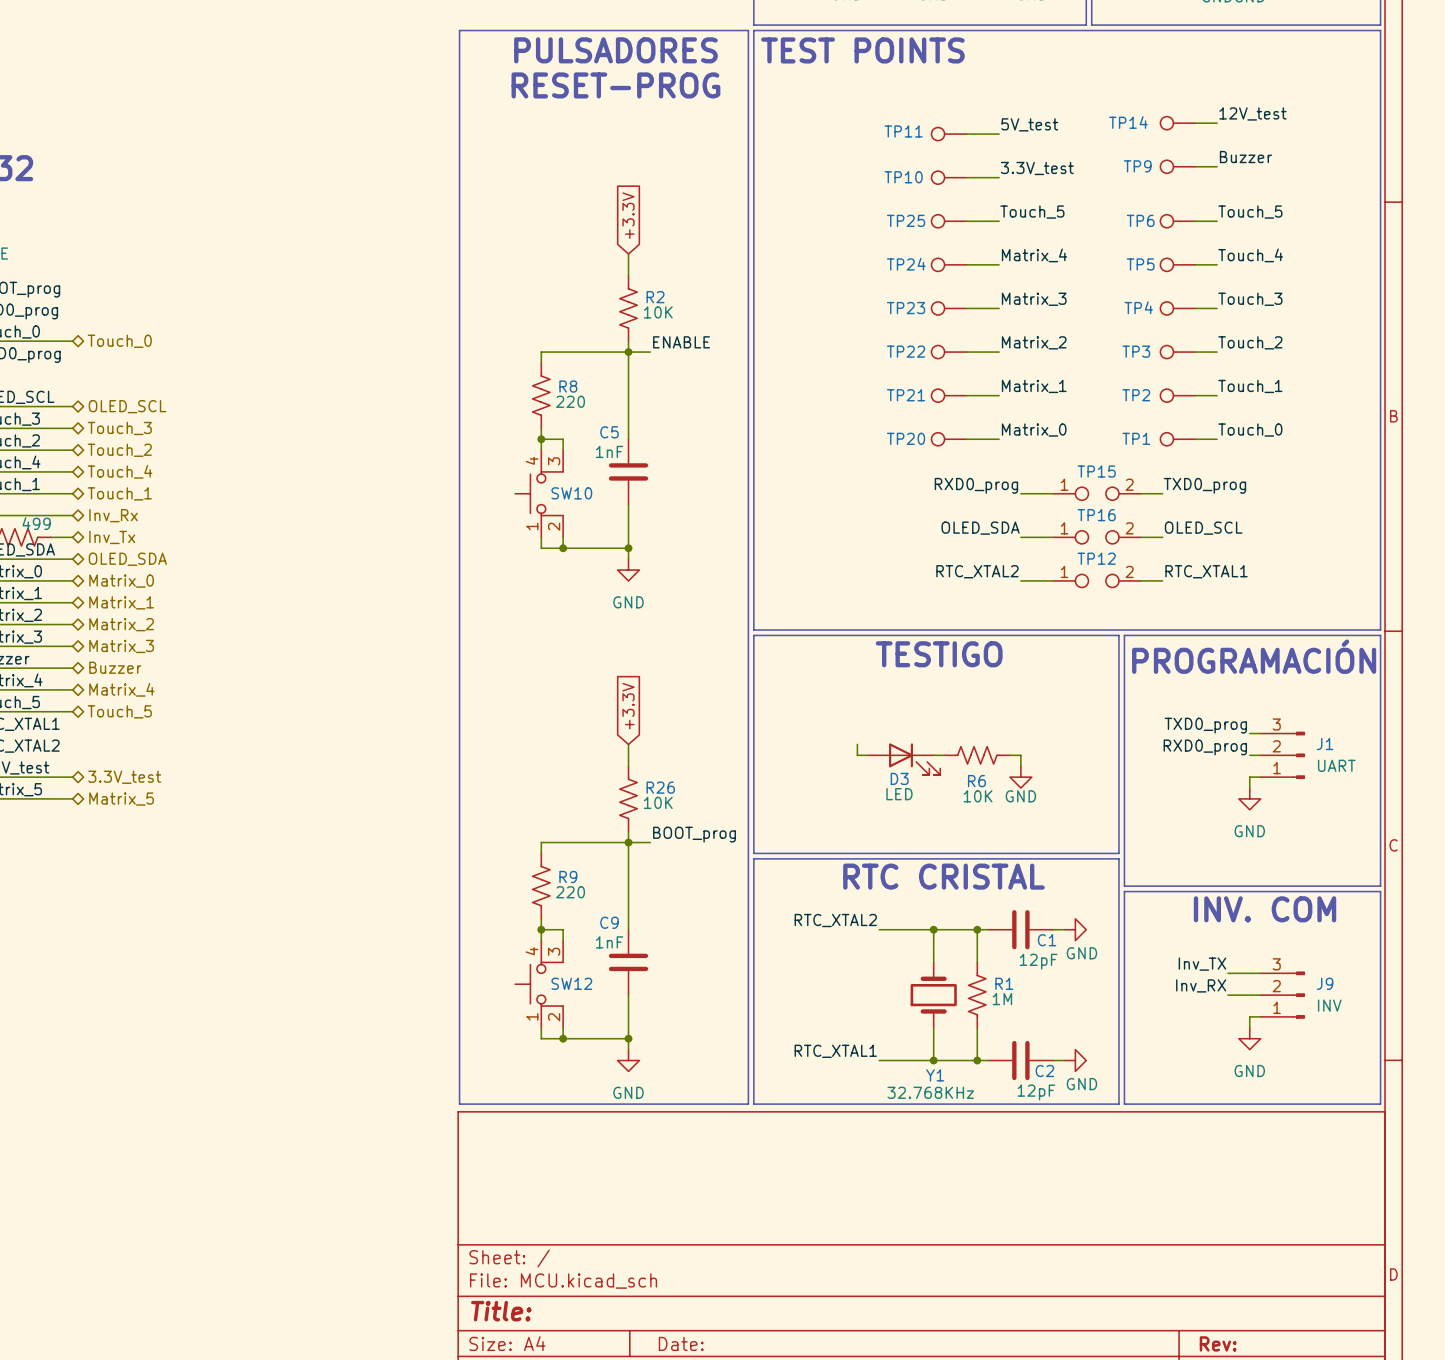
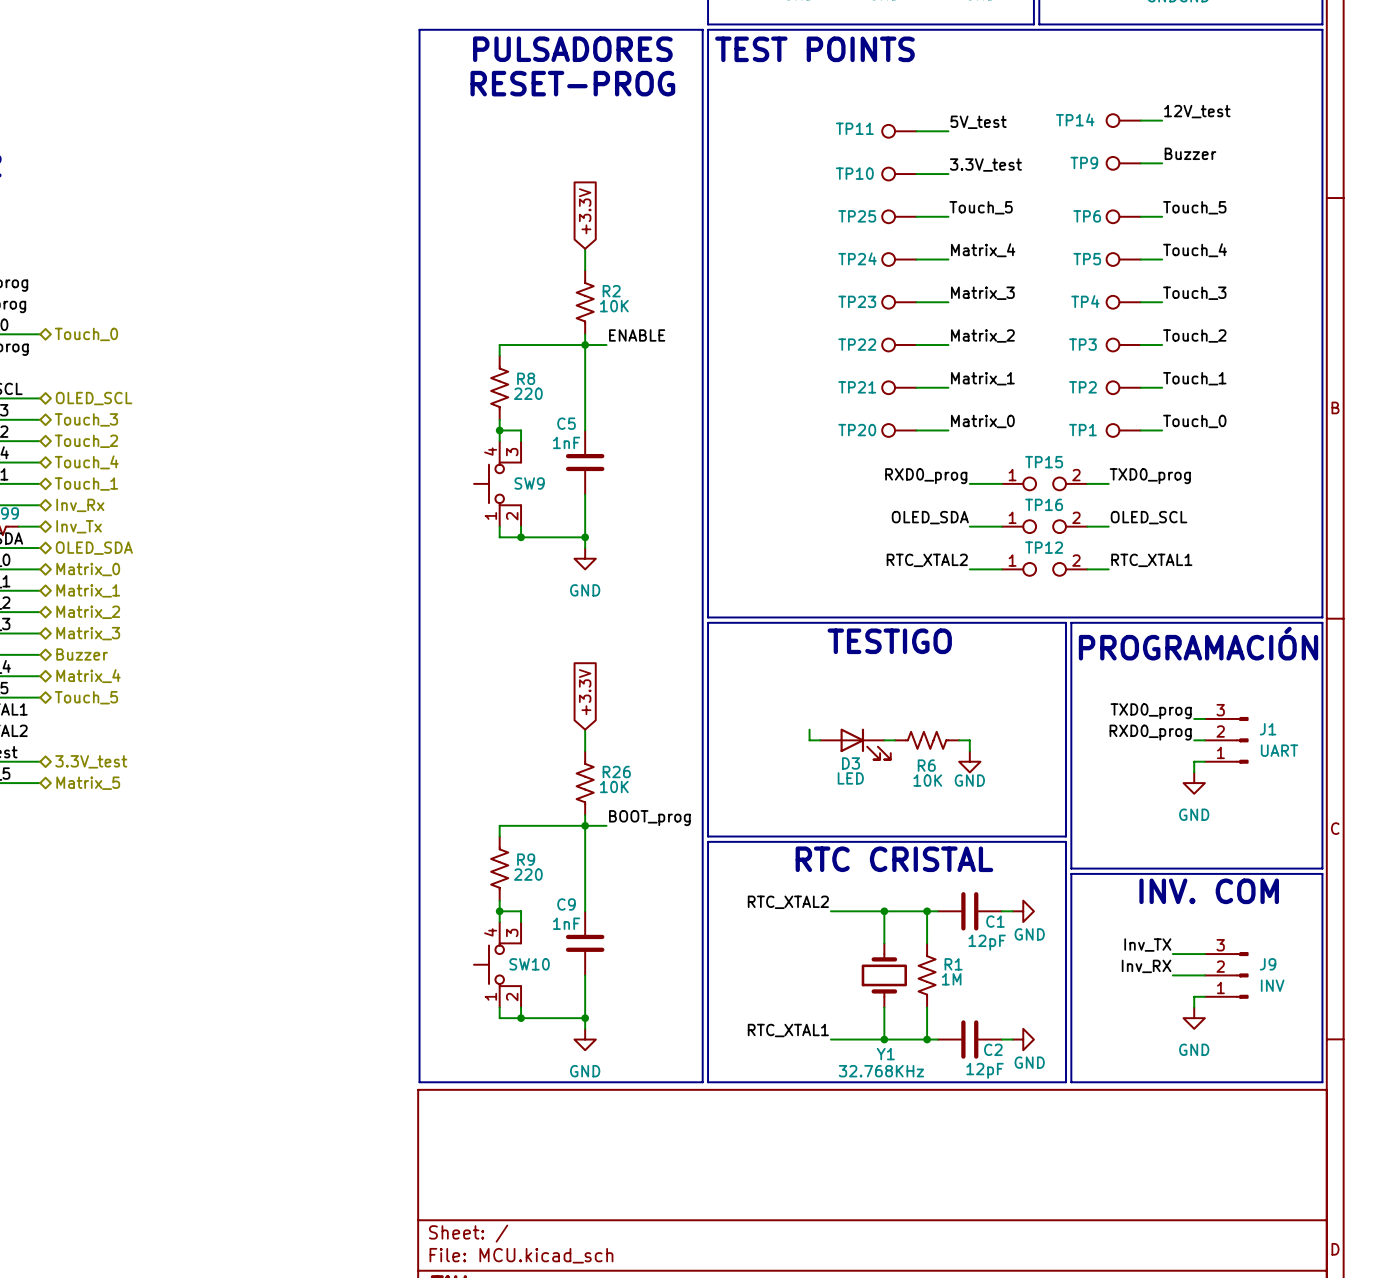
SW10 name: SW10 (571, 493) -> SW9 (529, 483)
SW12 name: SW12 (571, 983) -> SW10 (529, 964)

